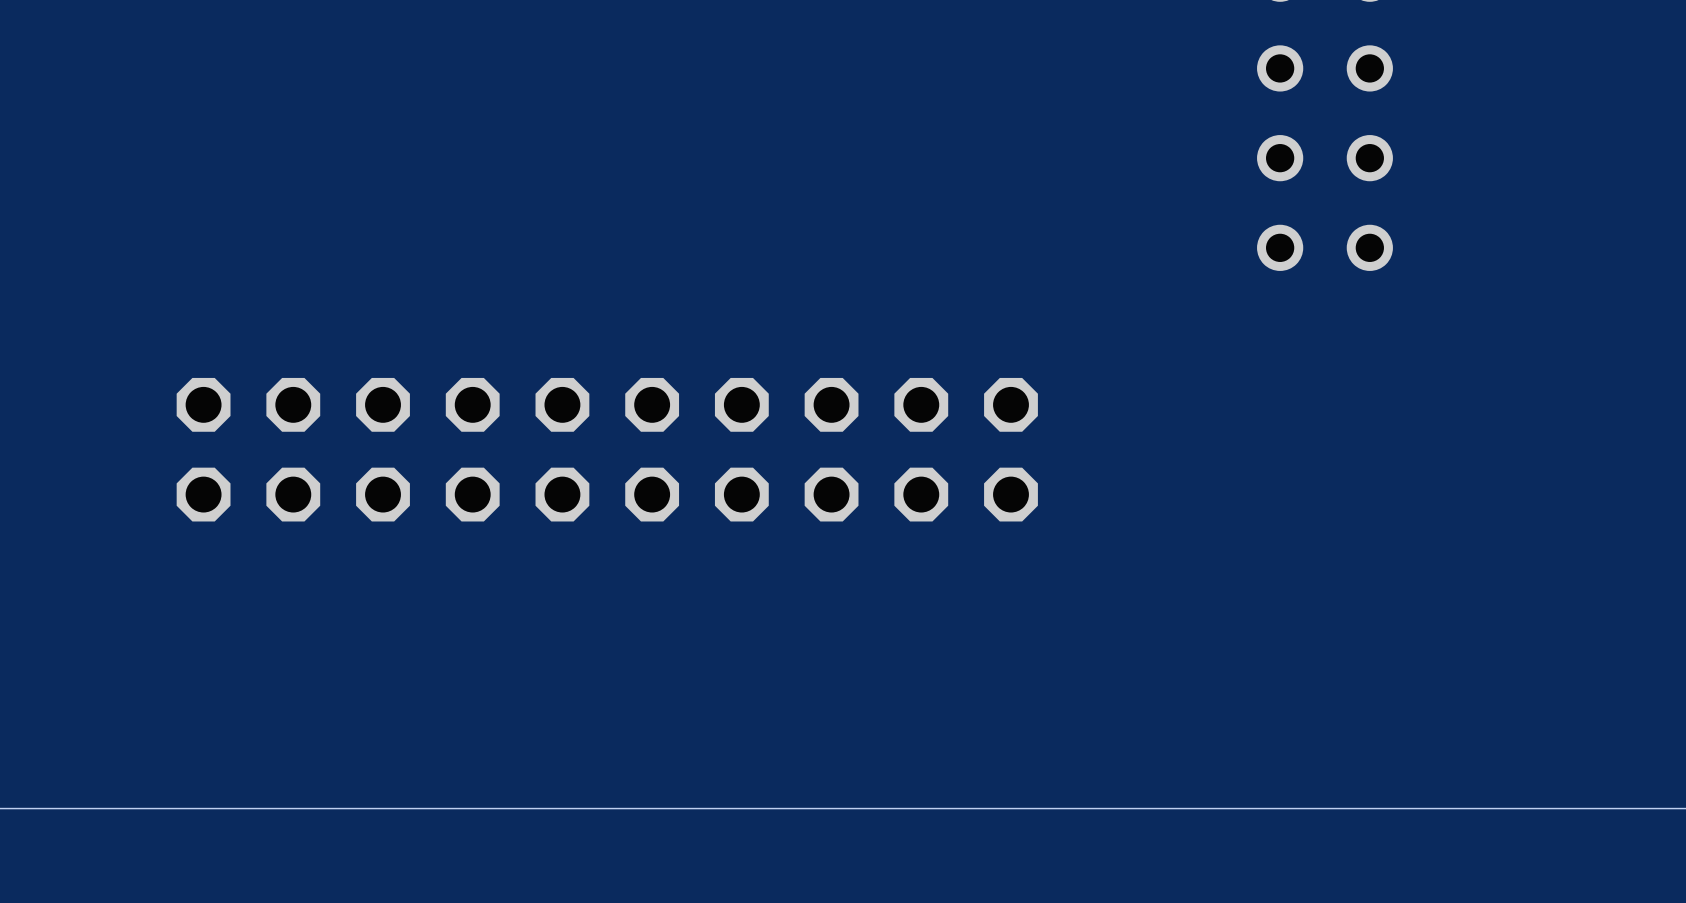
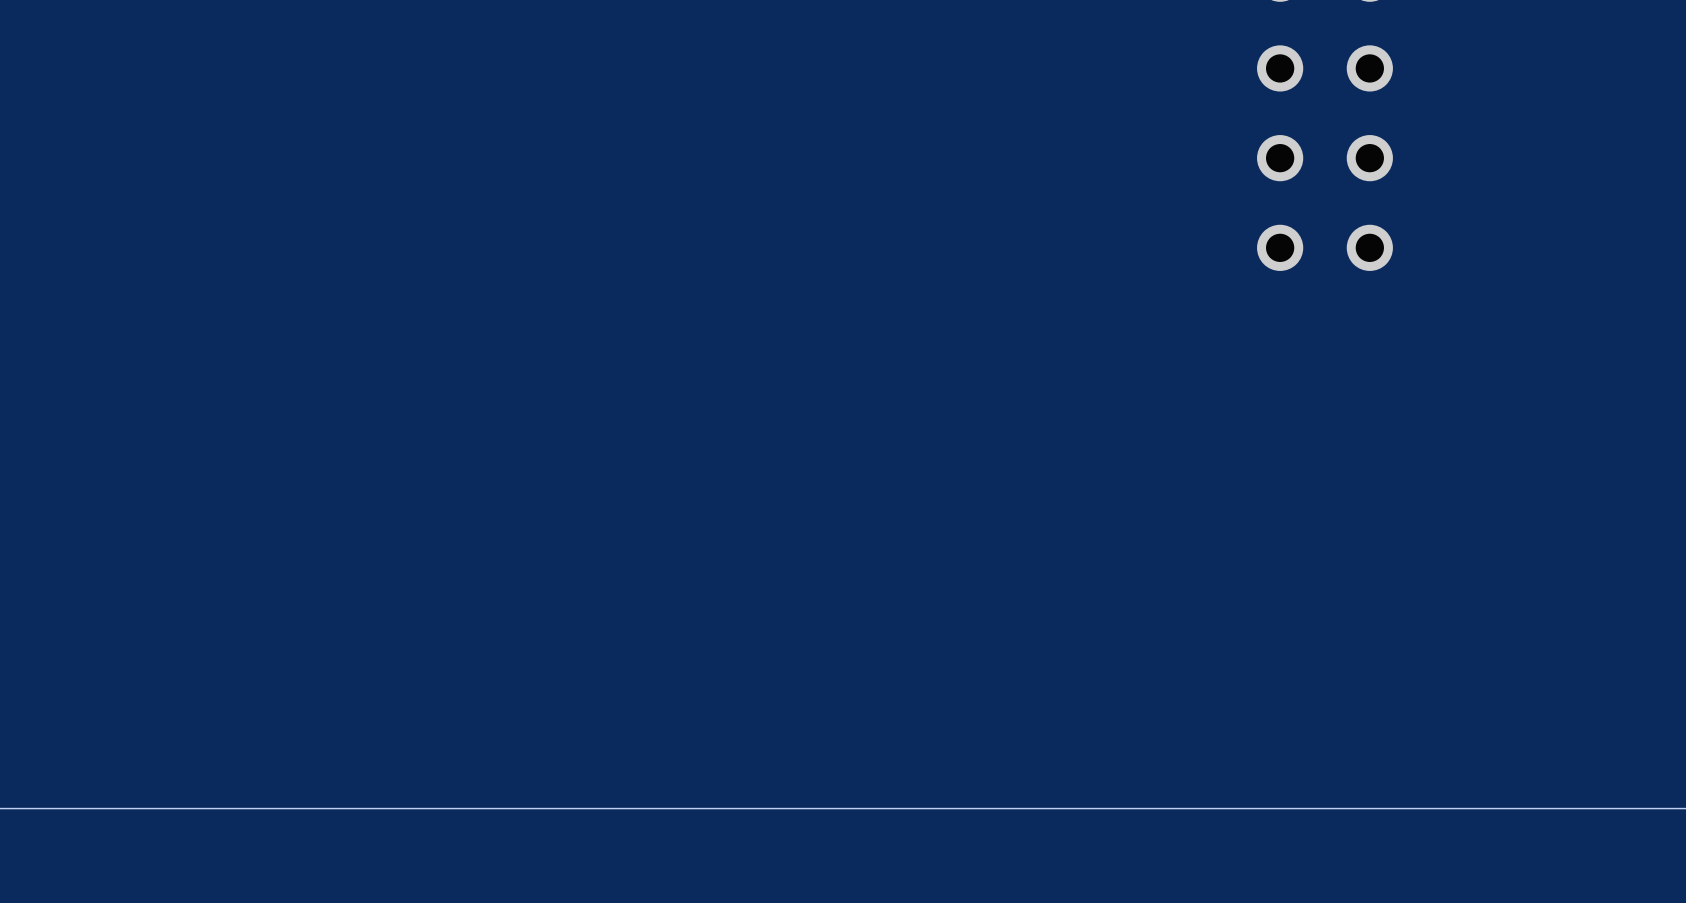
part: (607, 449) -> none

